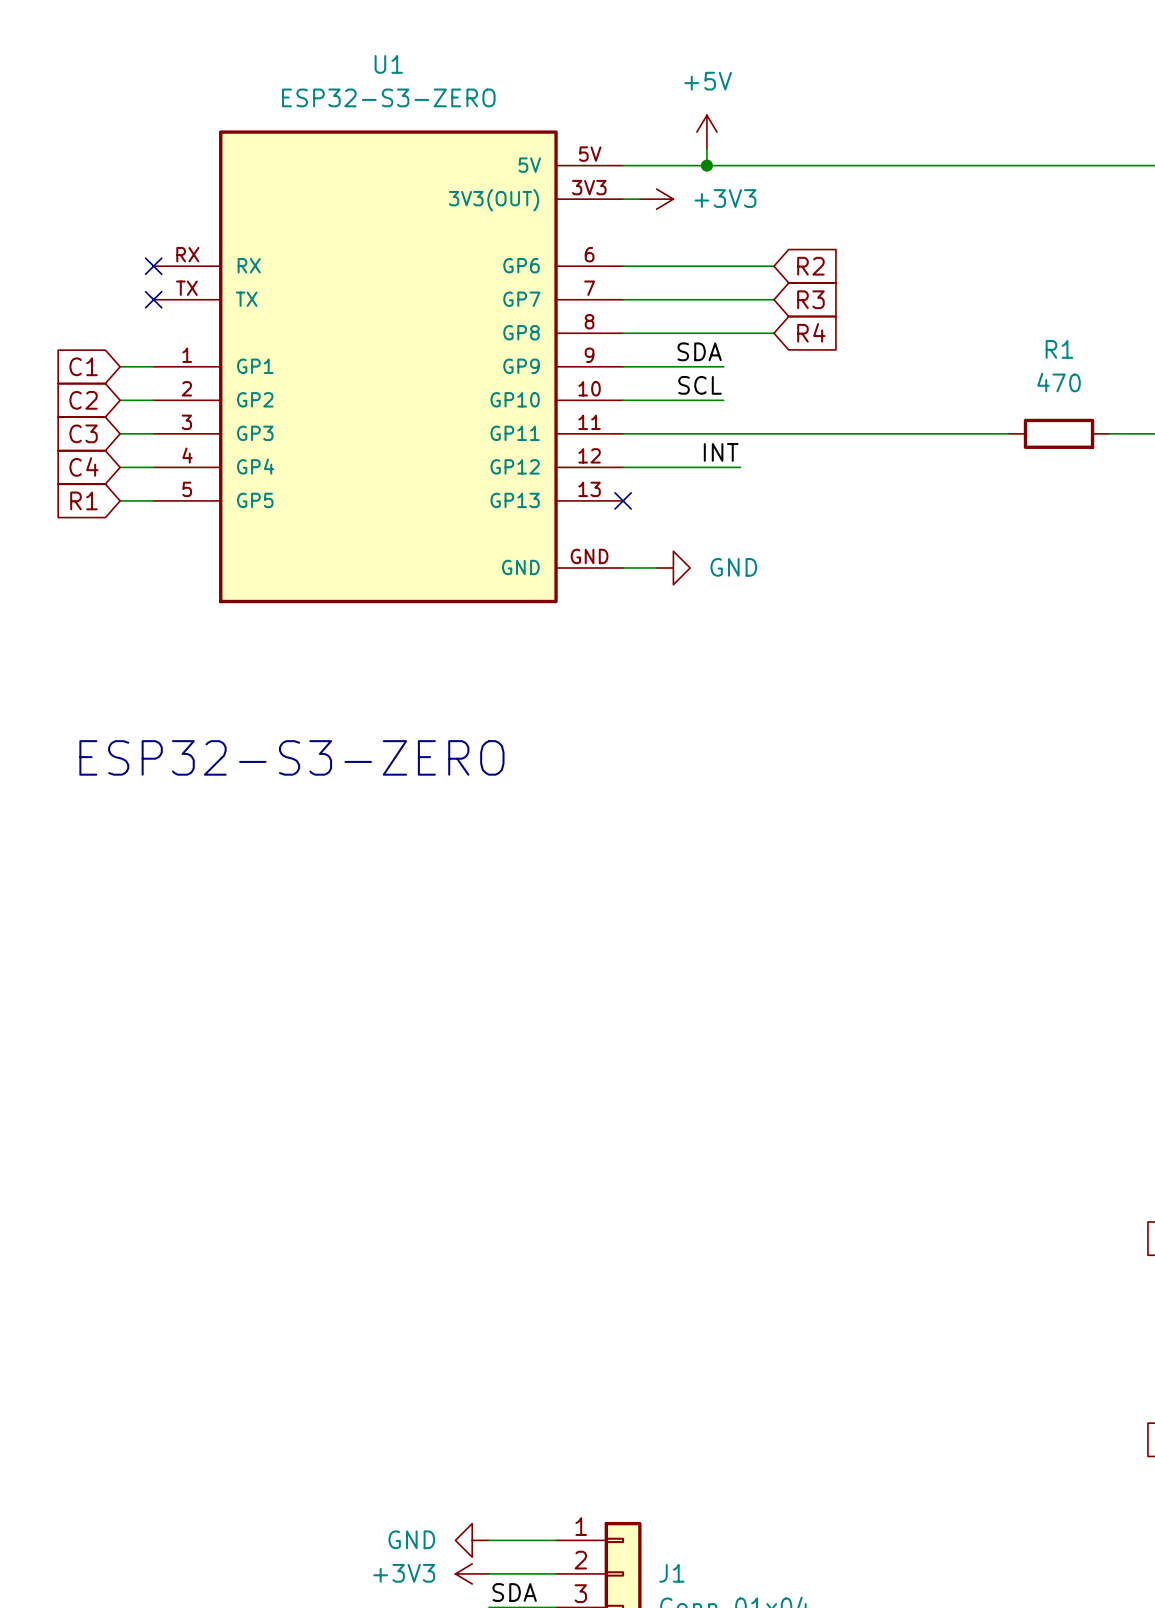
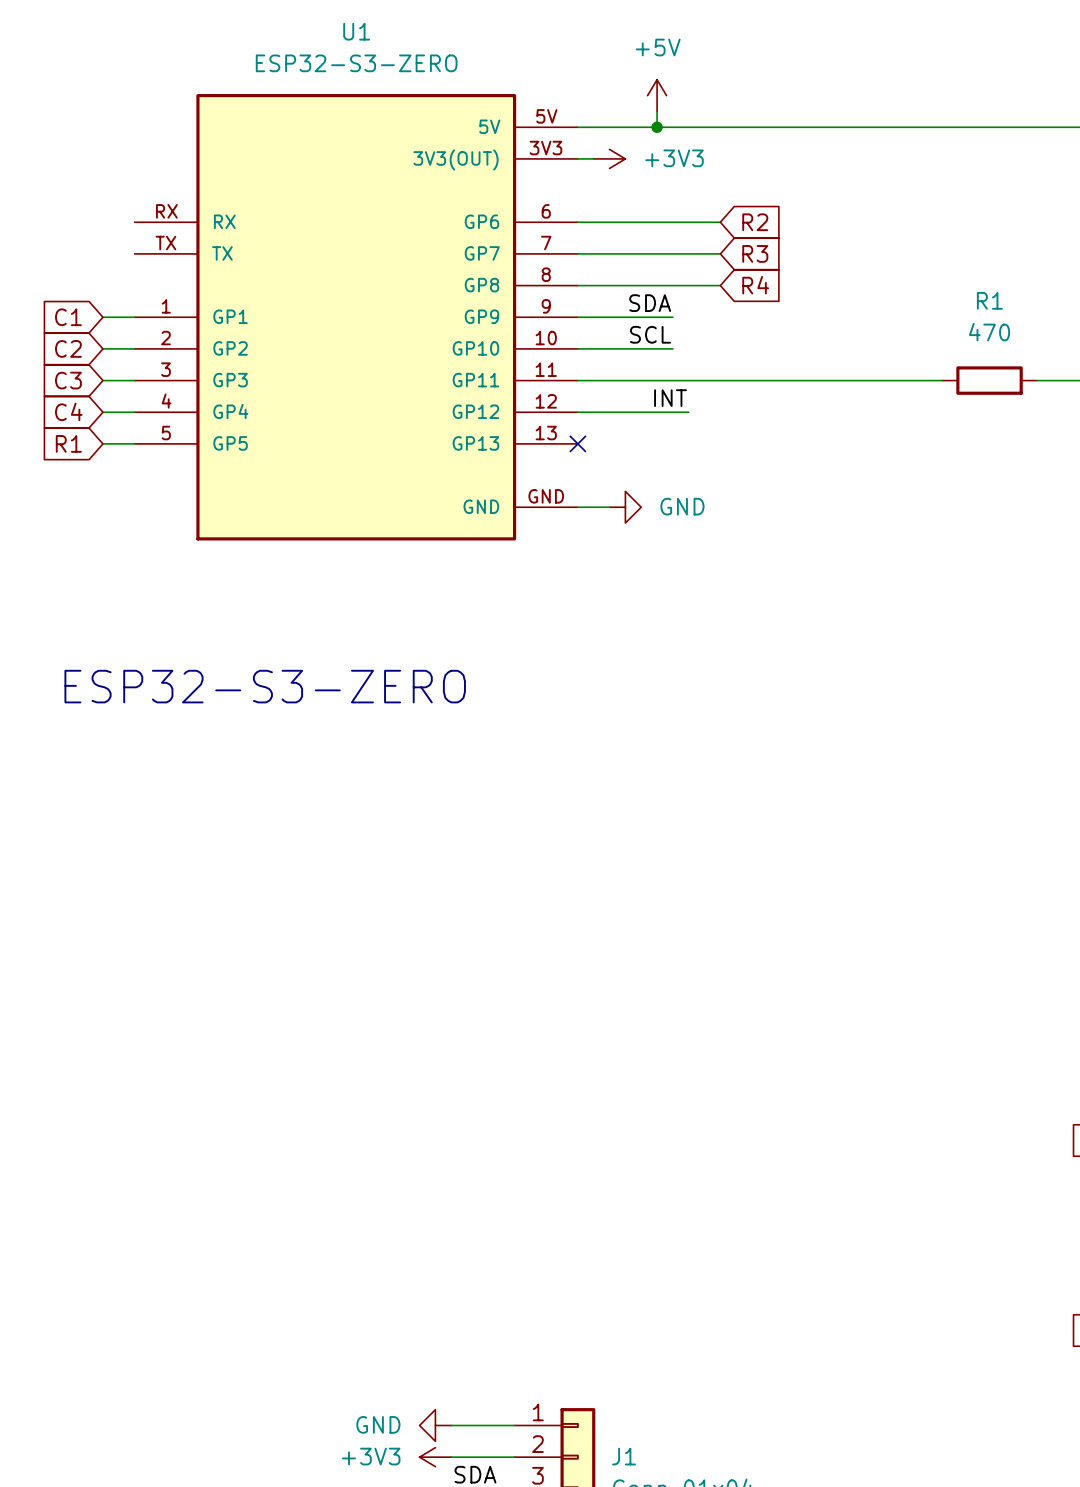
no-connect mark: (153, 266) -> none
no-connect mark: (153, 299) -> none

